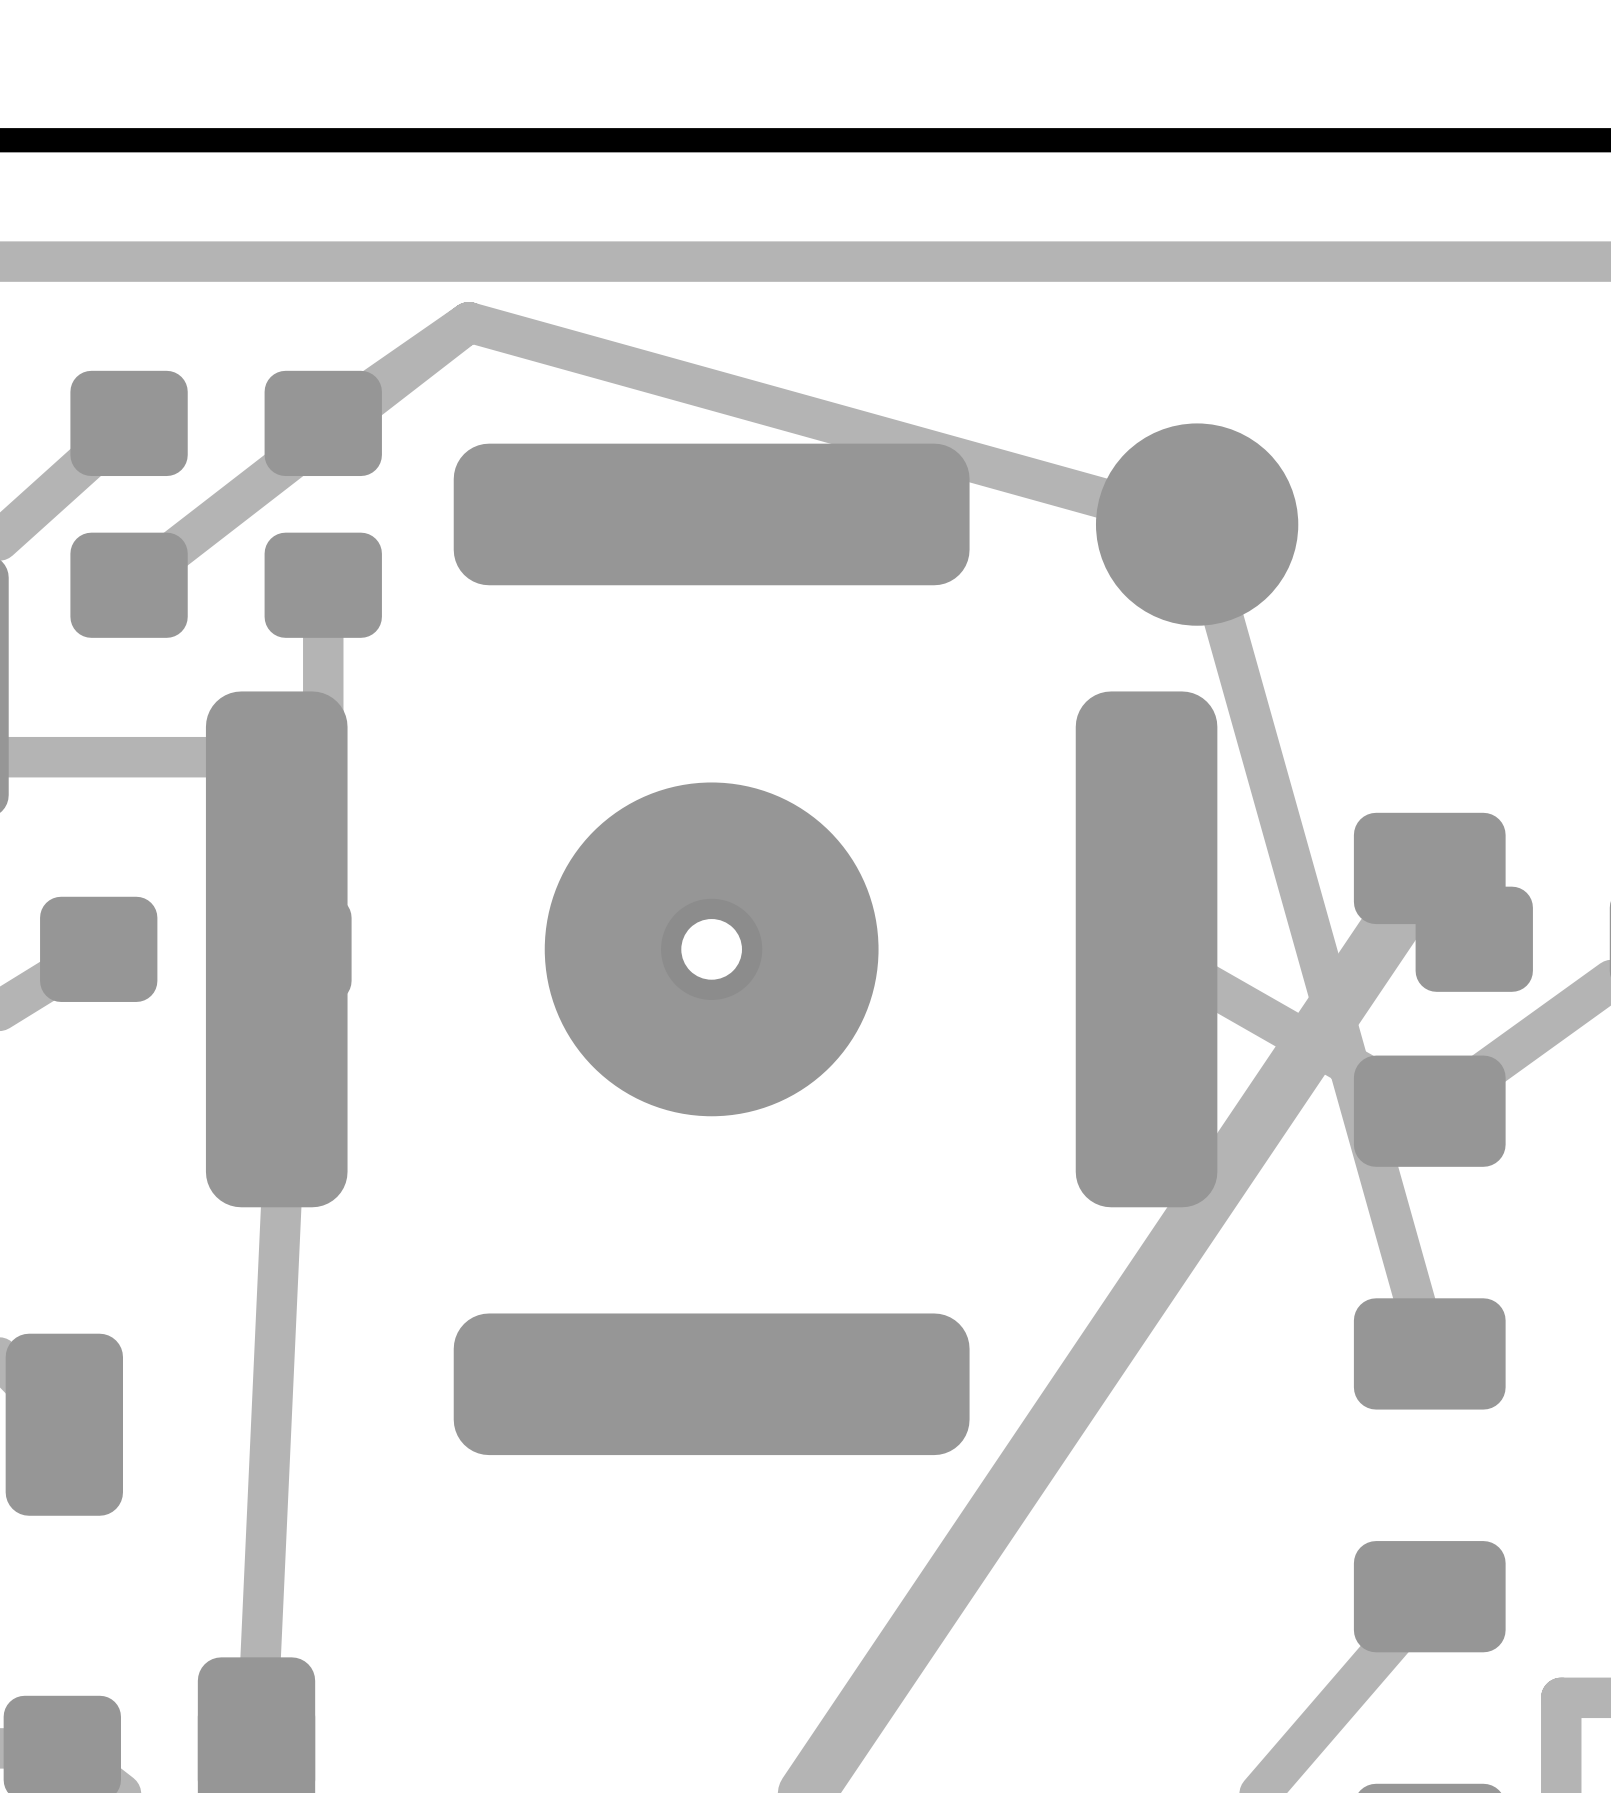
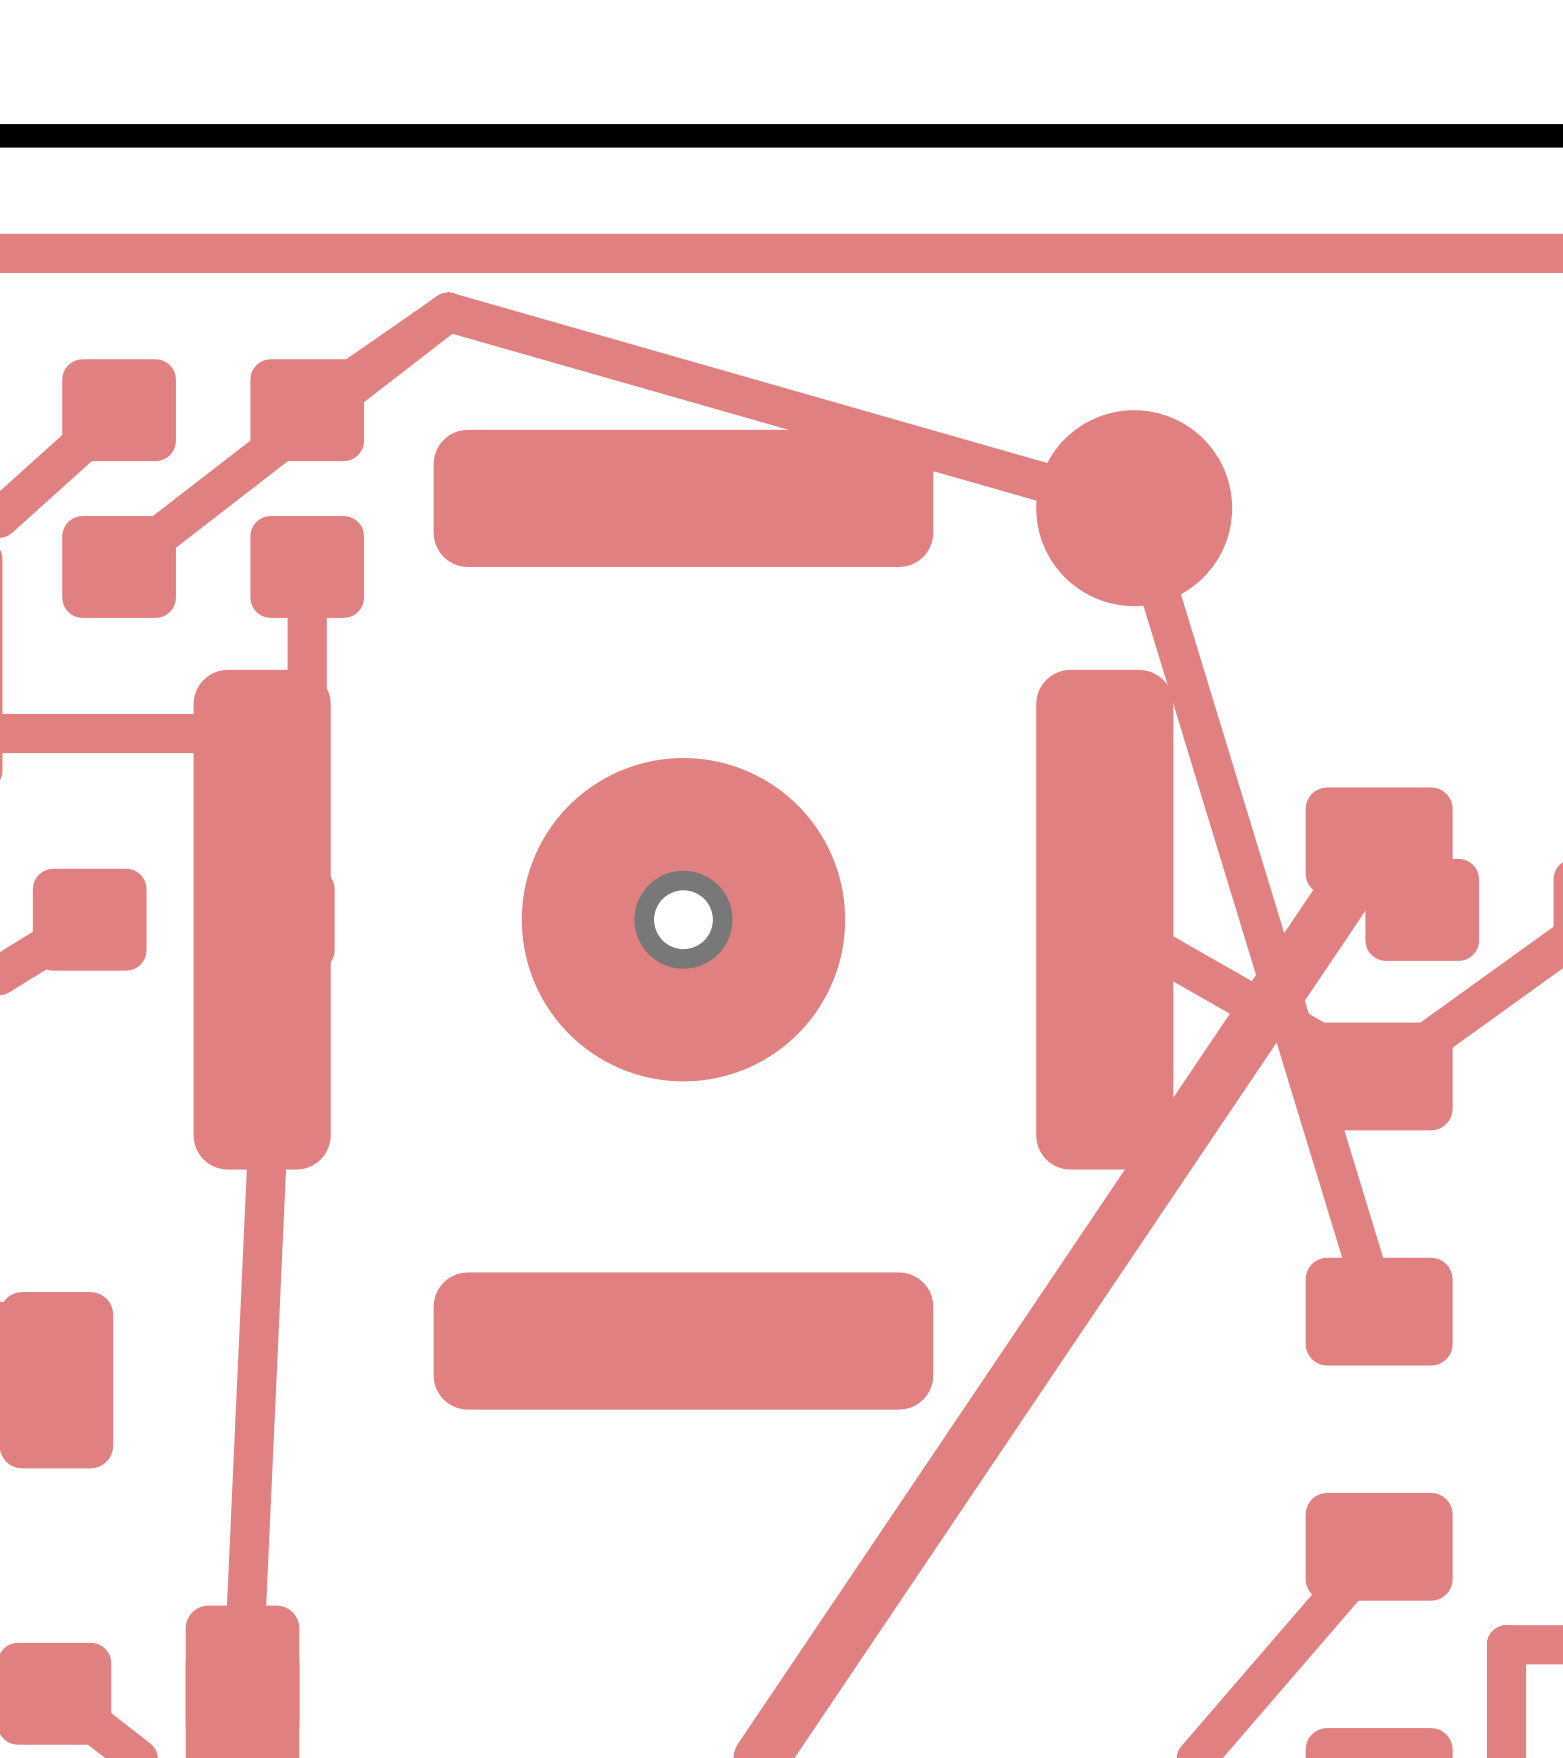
track: (468, 322) (1197, 524) (1429, 1353) -> (448, 312) (1134, 508) (1379, 1311)
part position: (1197, 524) -> (1134, 508)

